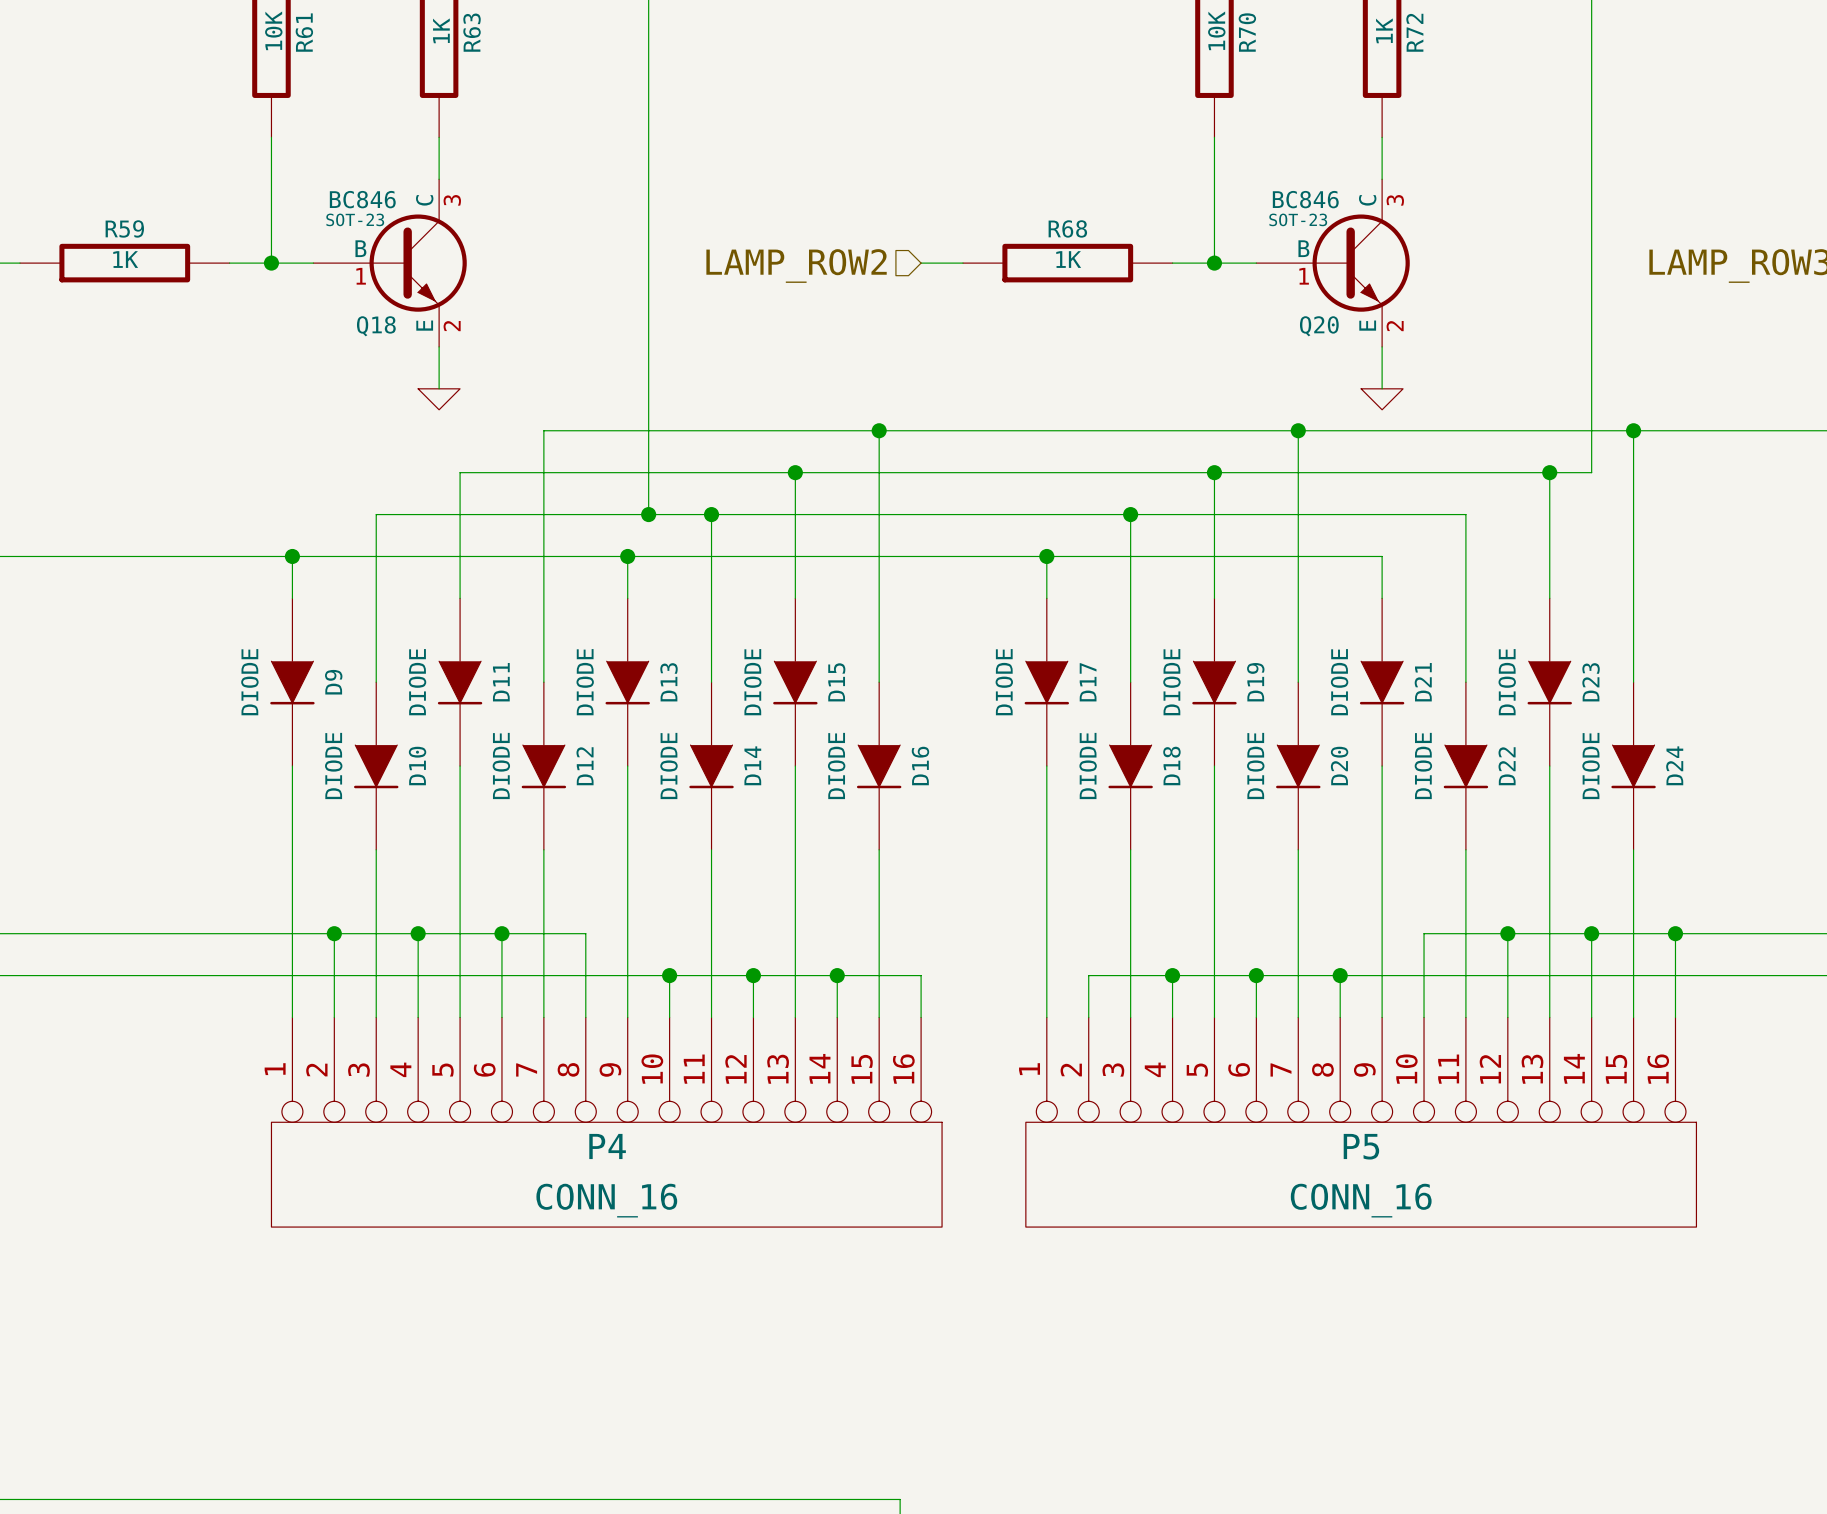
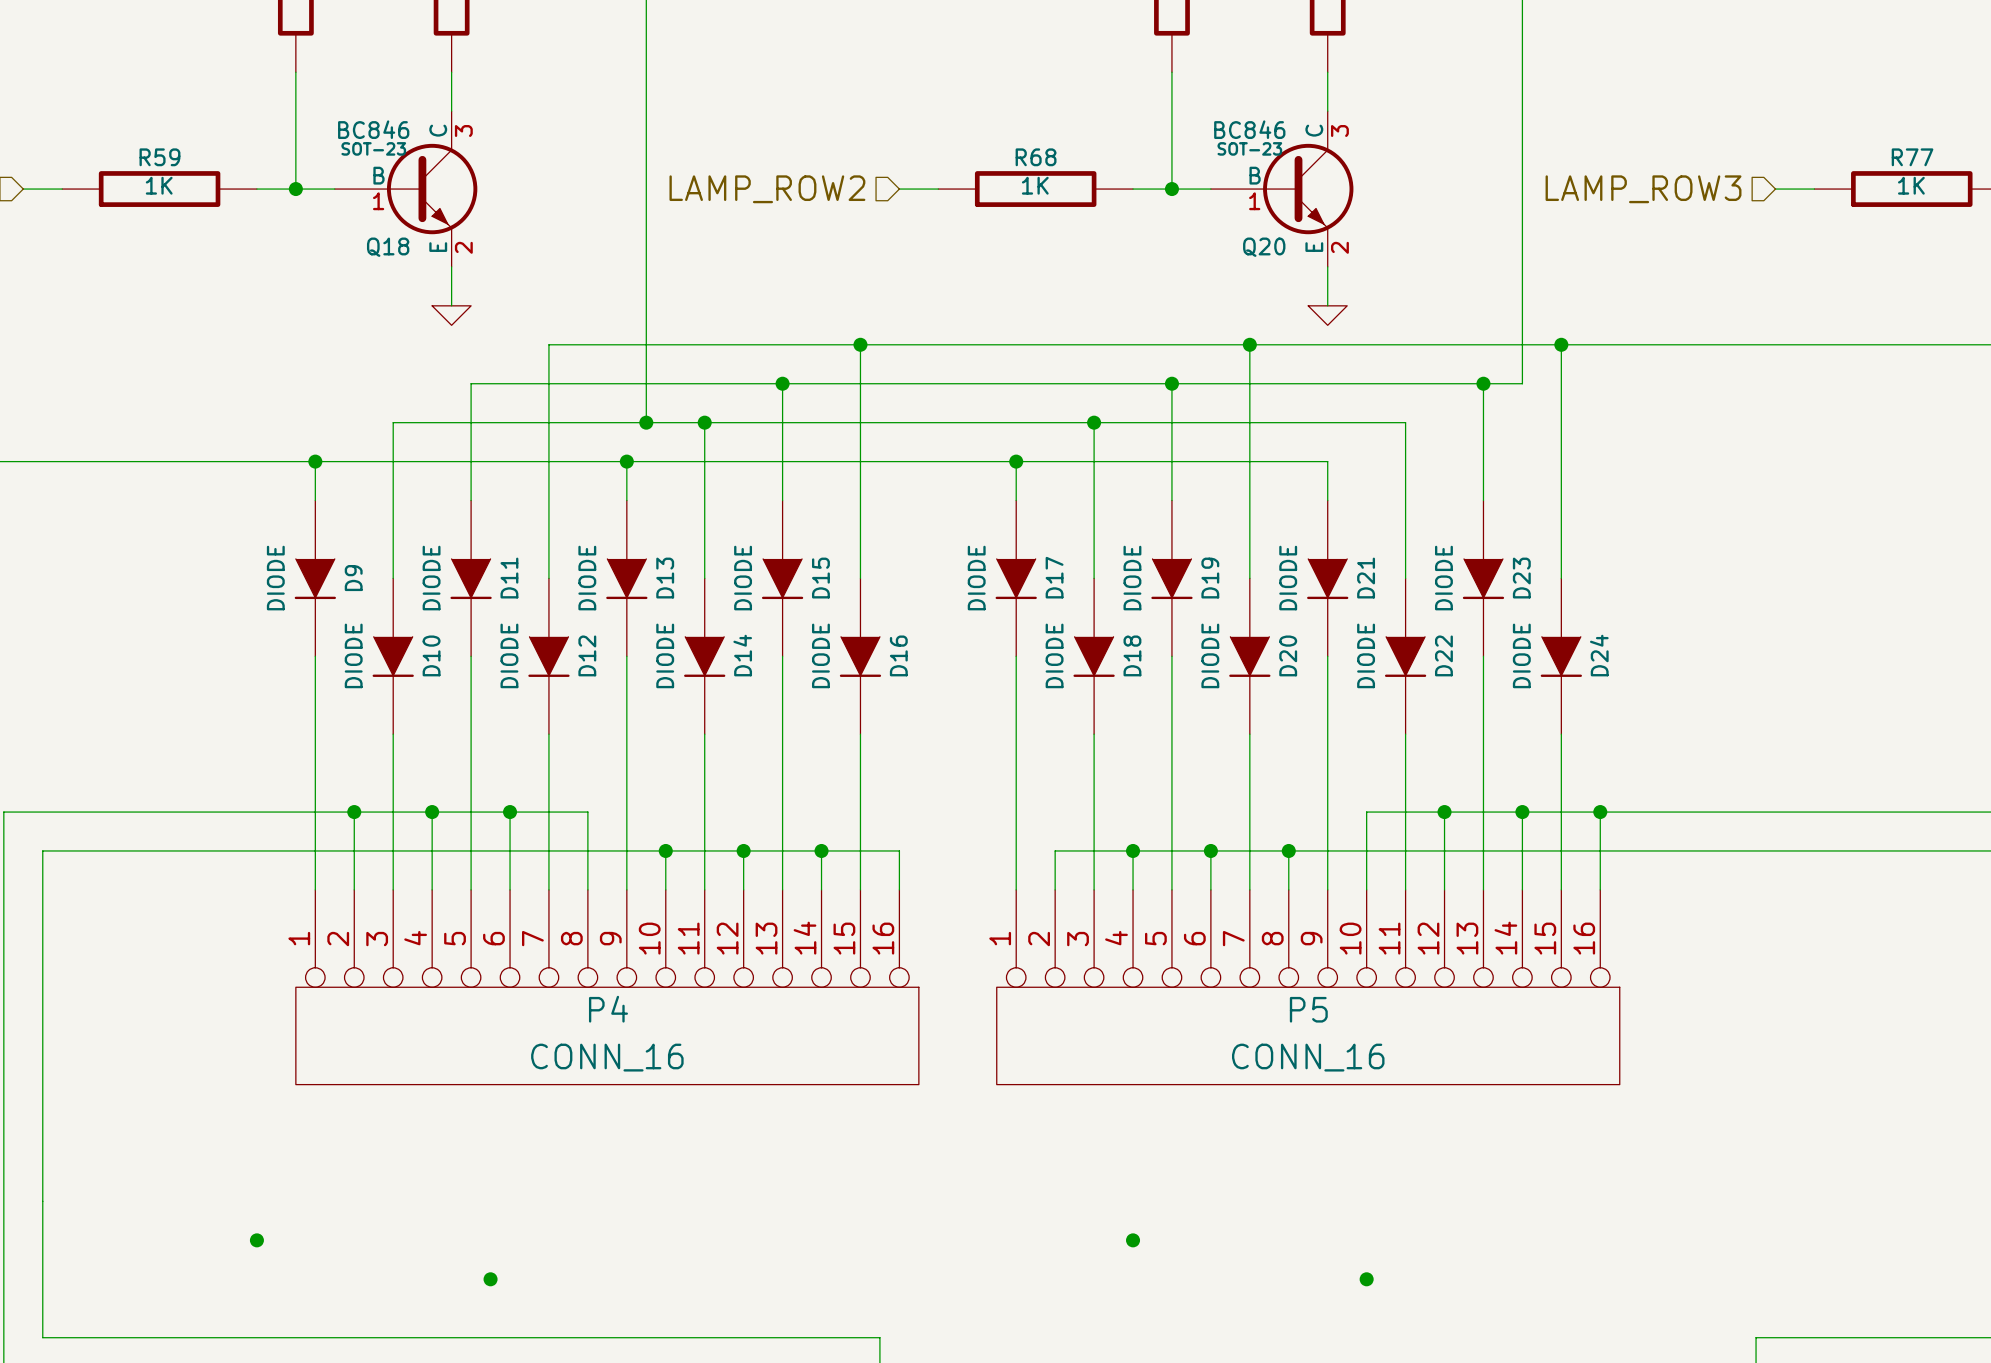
junction: none -> (256, 1240)
junction: none -> (1133, 1240)
junction: none -> (490, 1279)
junction: none -> (1366, 1279)

